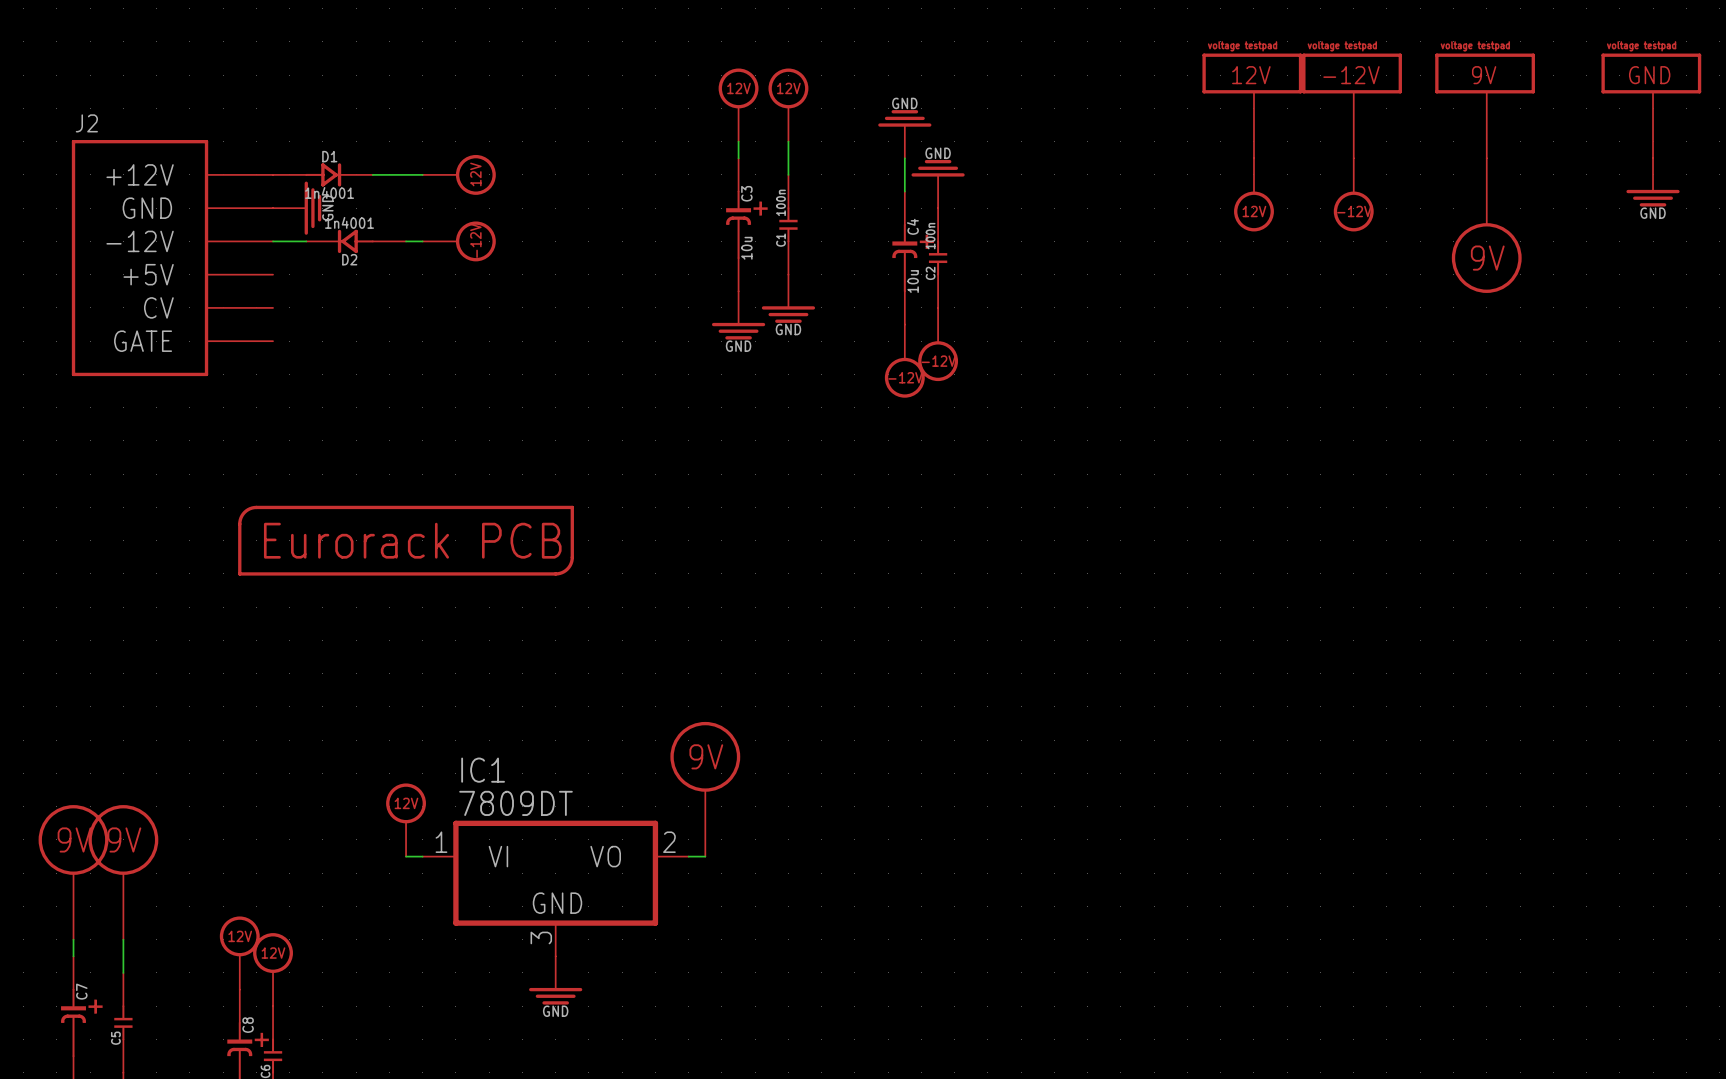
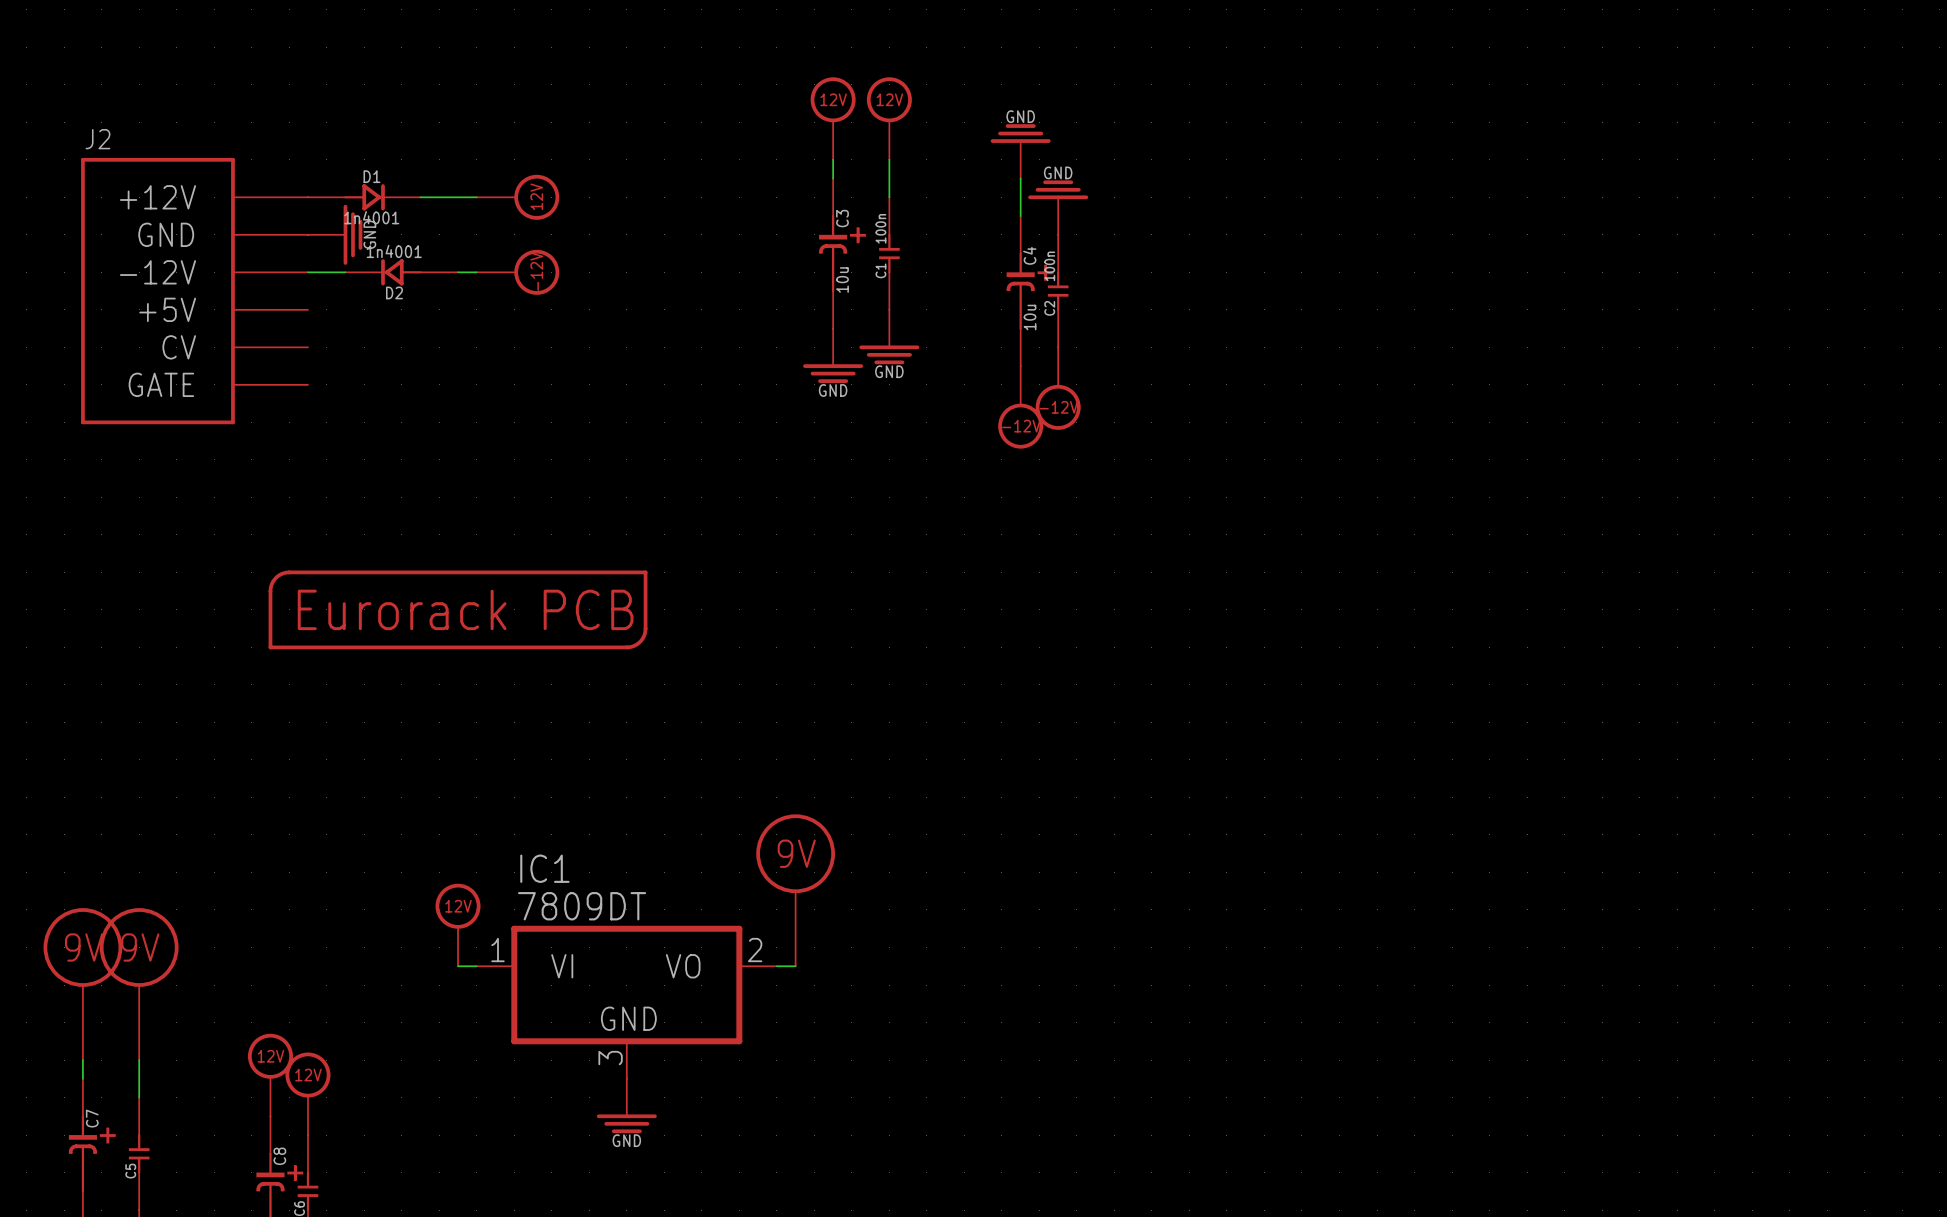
part: (1252, 105) -> none
part: (1352, 105) -> none
part: (1485, 105) -> none
part: (1651, 105) -> none
power symbol: GND (1653, 182) -> none
power symbol: (1253, 194) -> none
power symbol: (1353, 194) -> none
power symbol: (1486, 225) -> none

